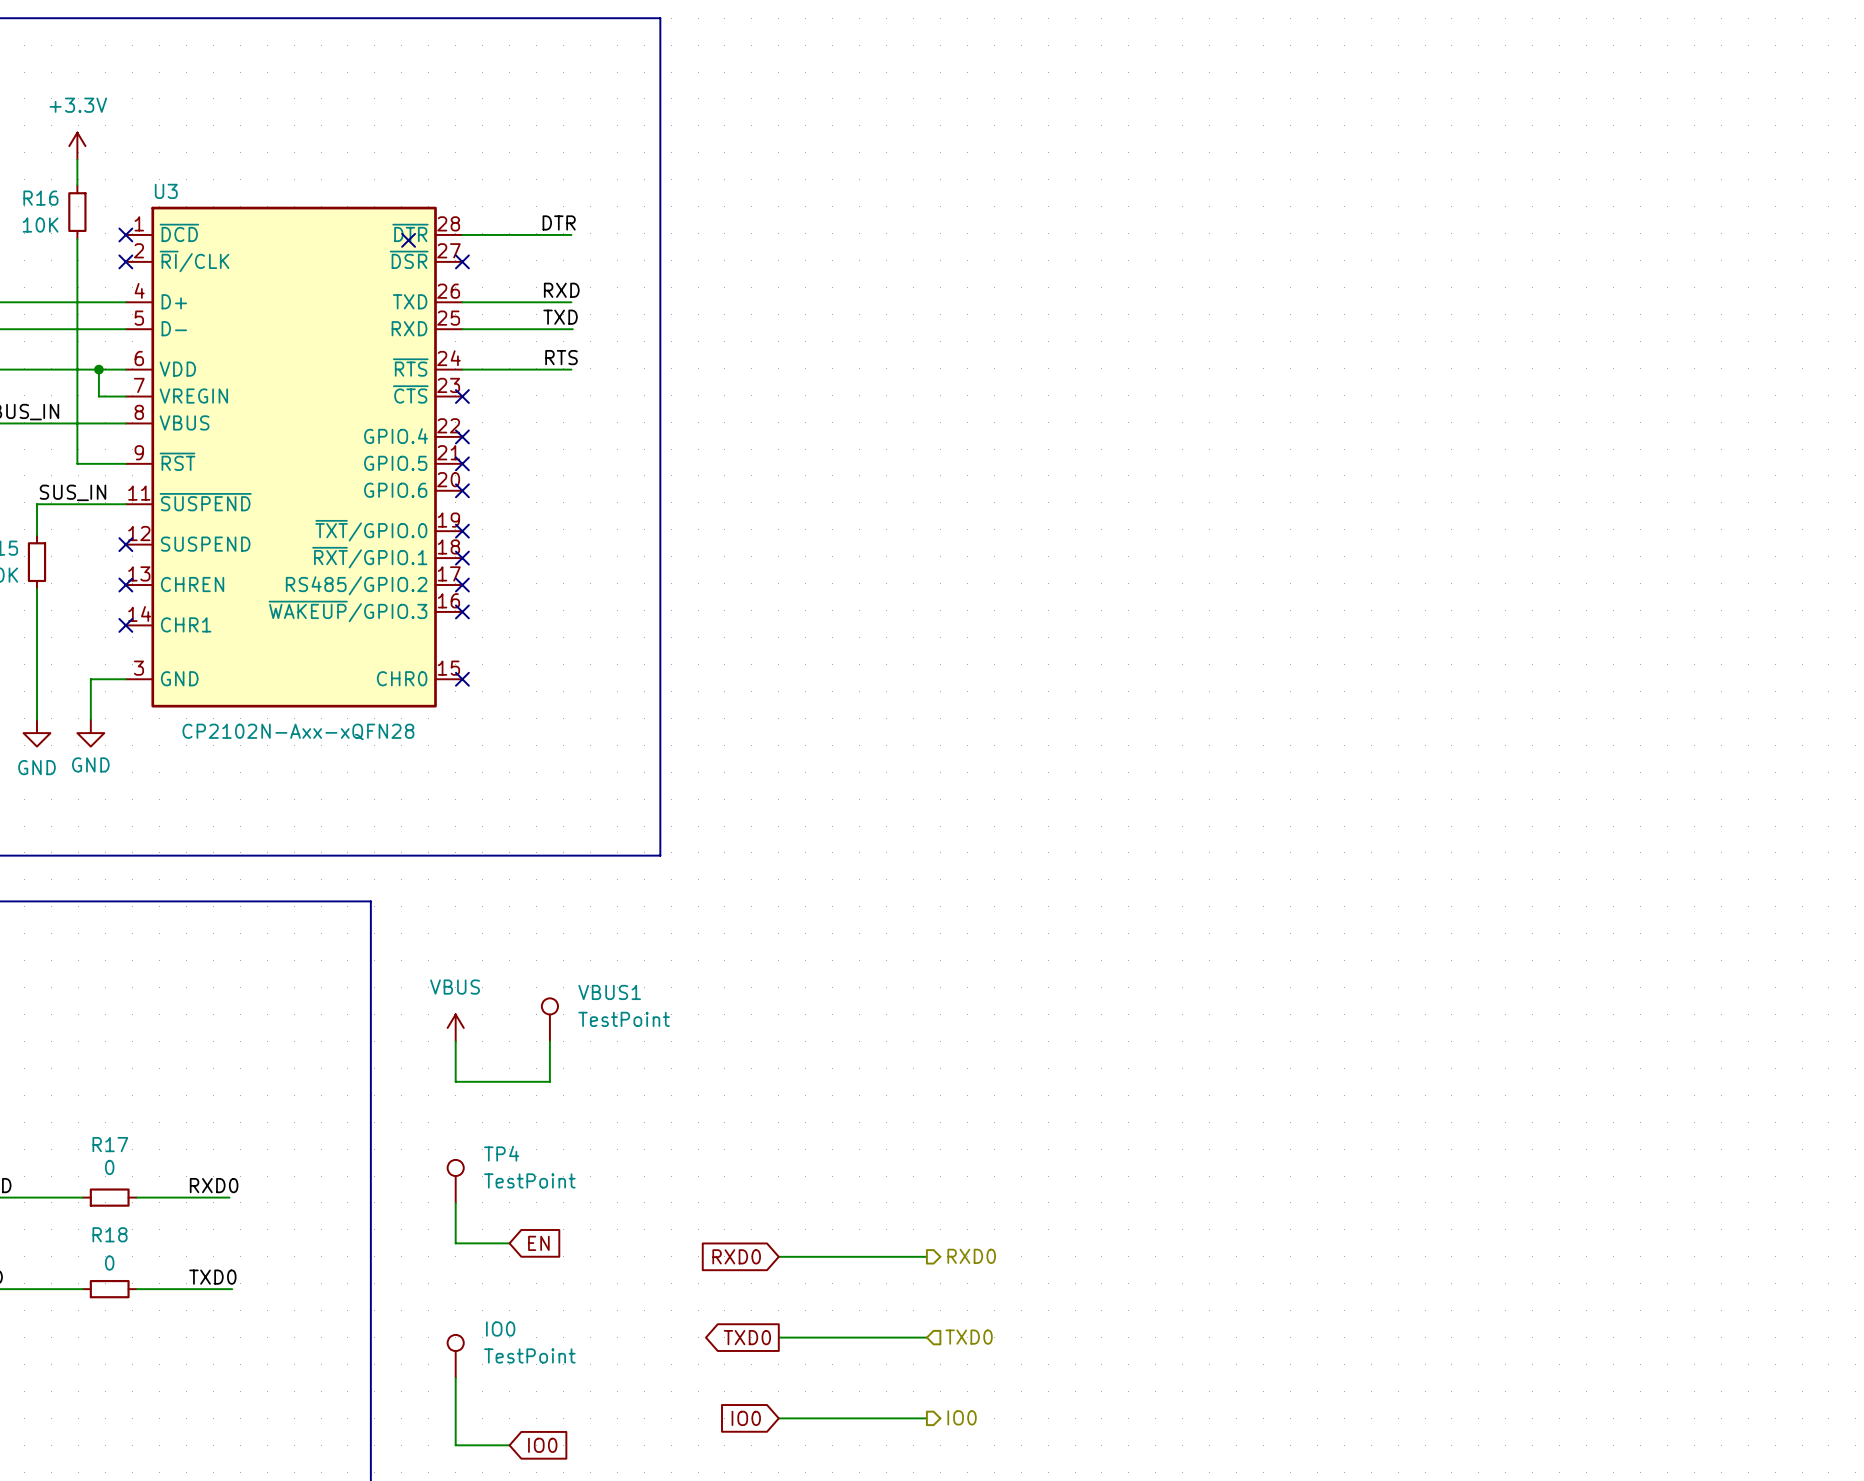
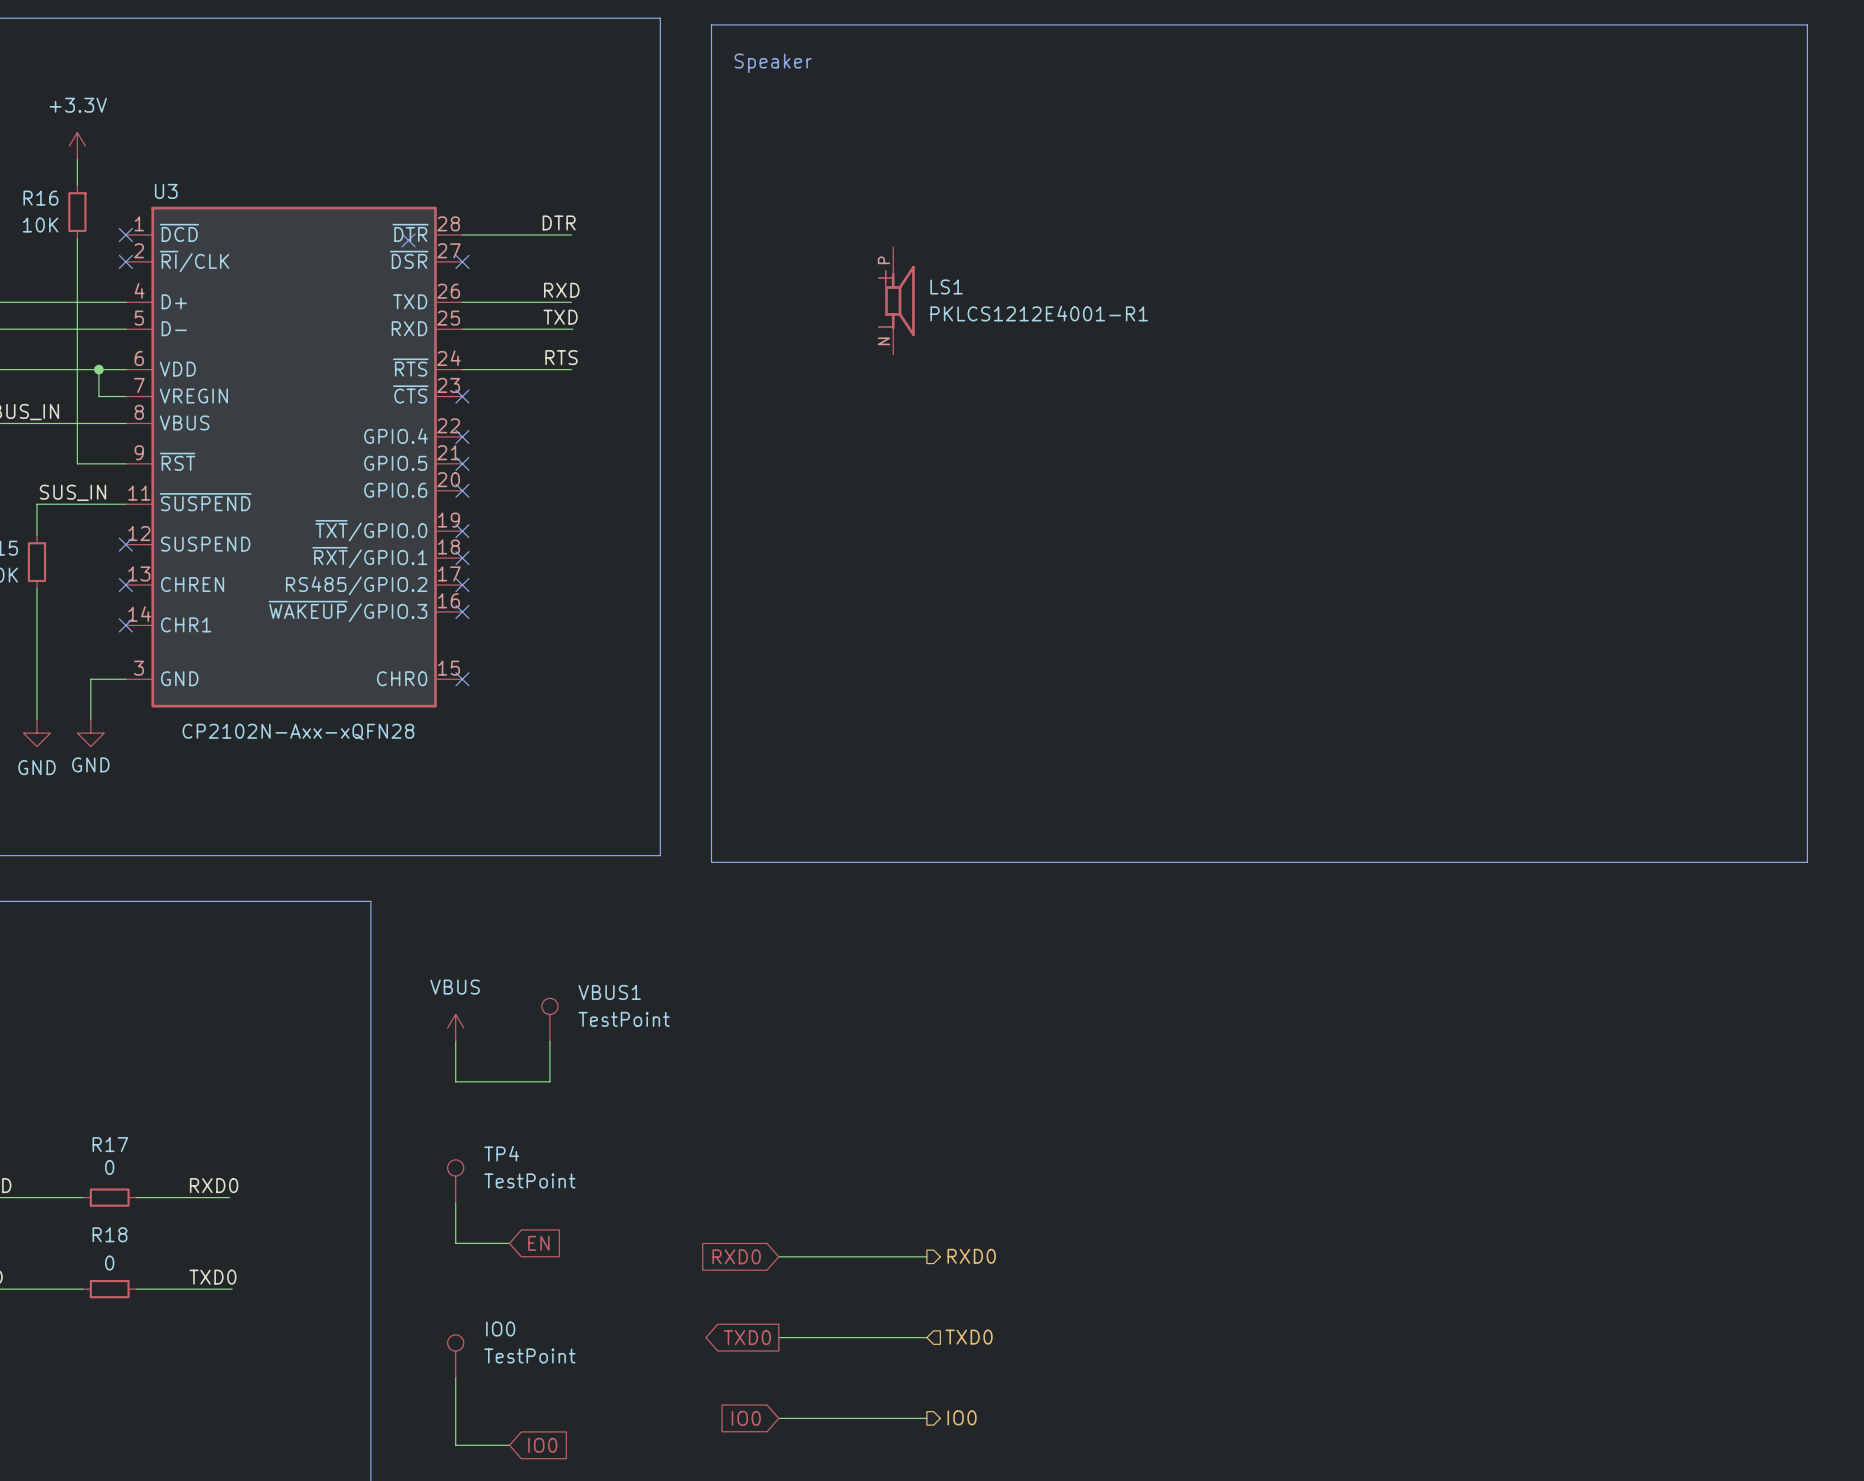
line: none -> (711, 24) (1807, 24) (1807, 862) (711, 862) (711, 24)
text: none -> Speaker (773, 63)
LS1: none -> PKLCS1212E4001-R1 (899, 300)

